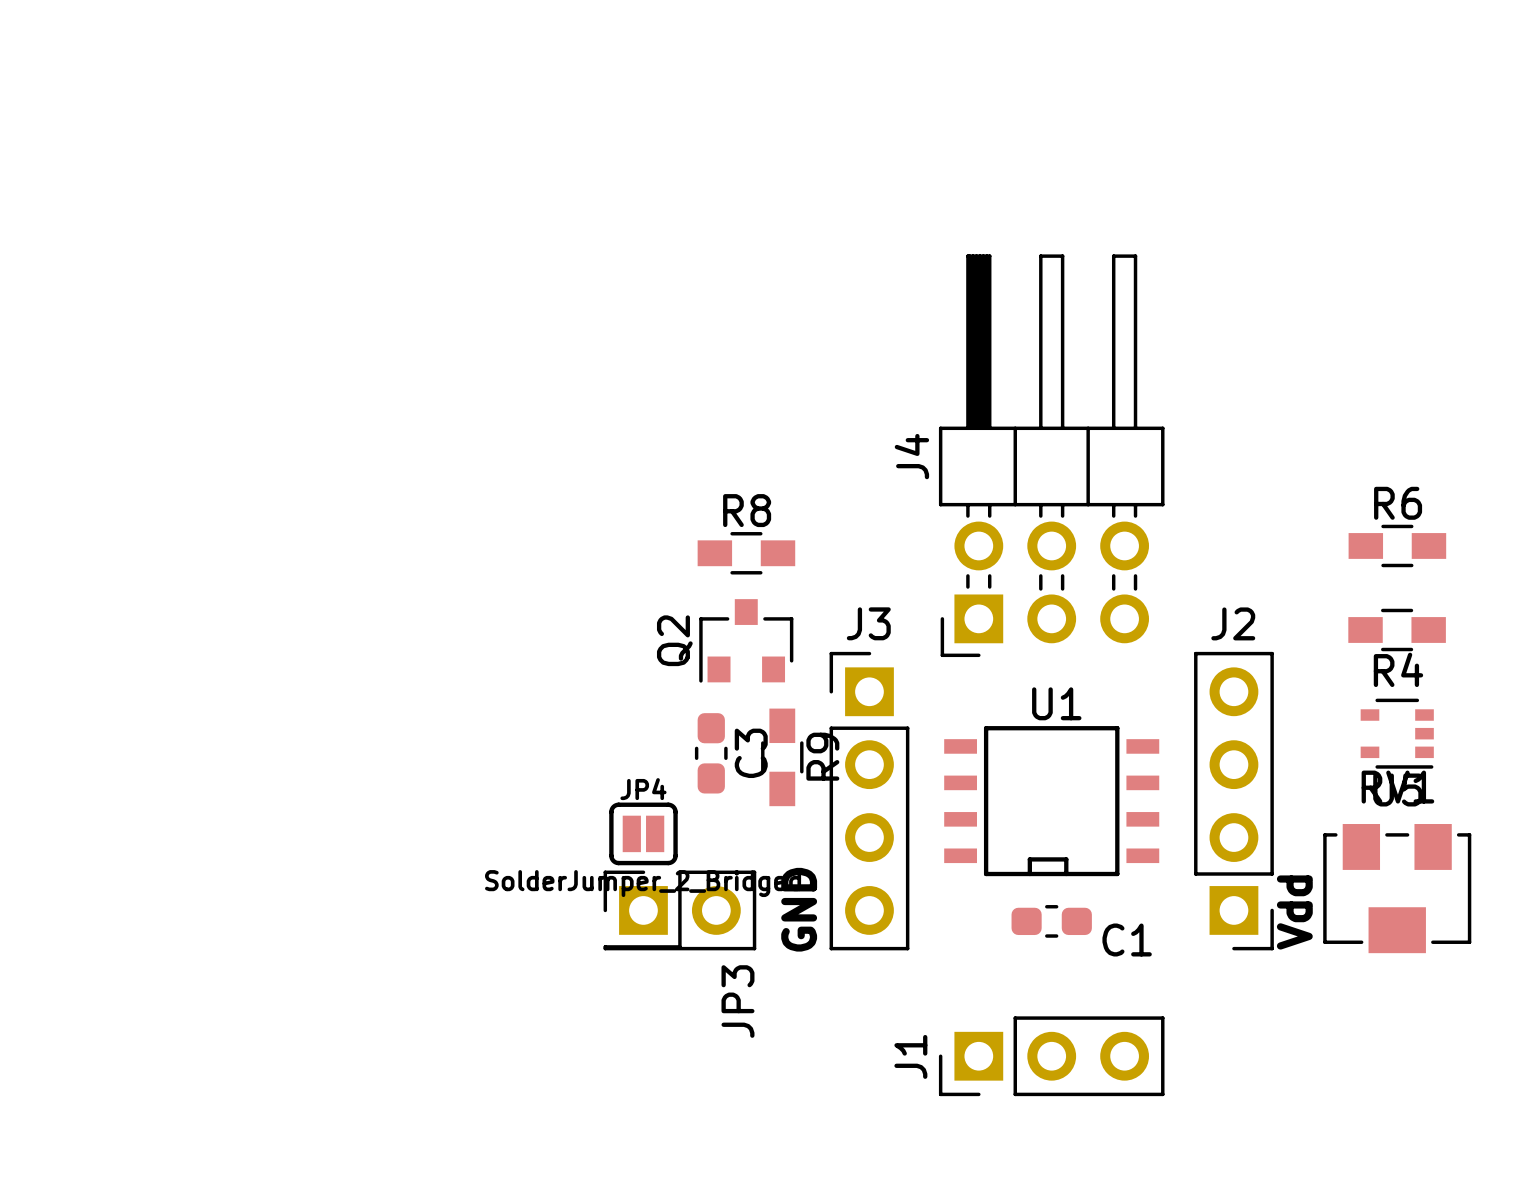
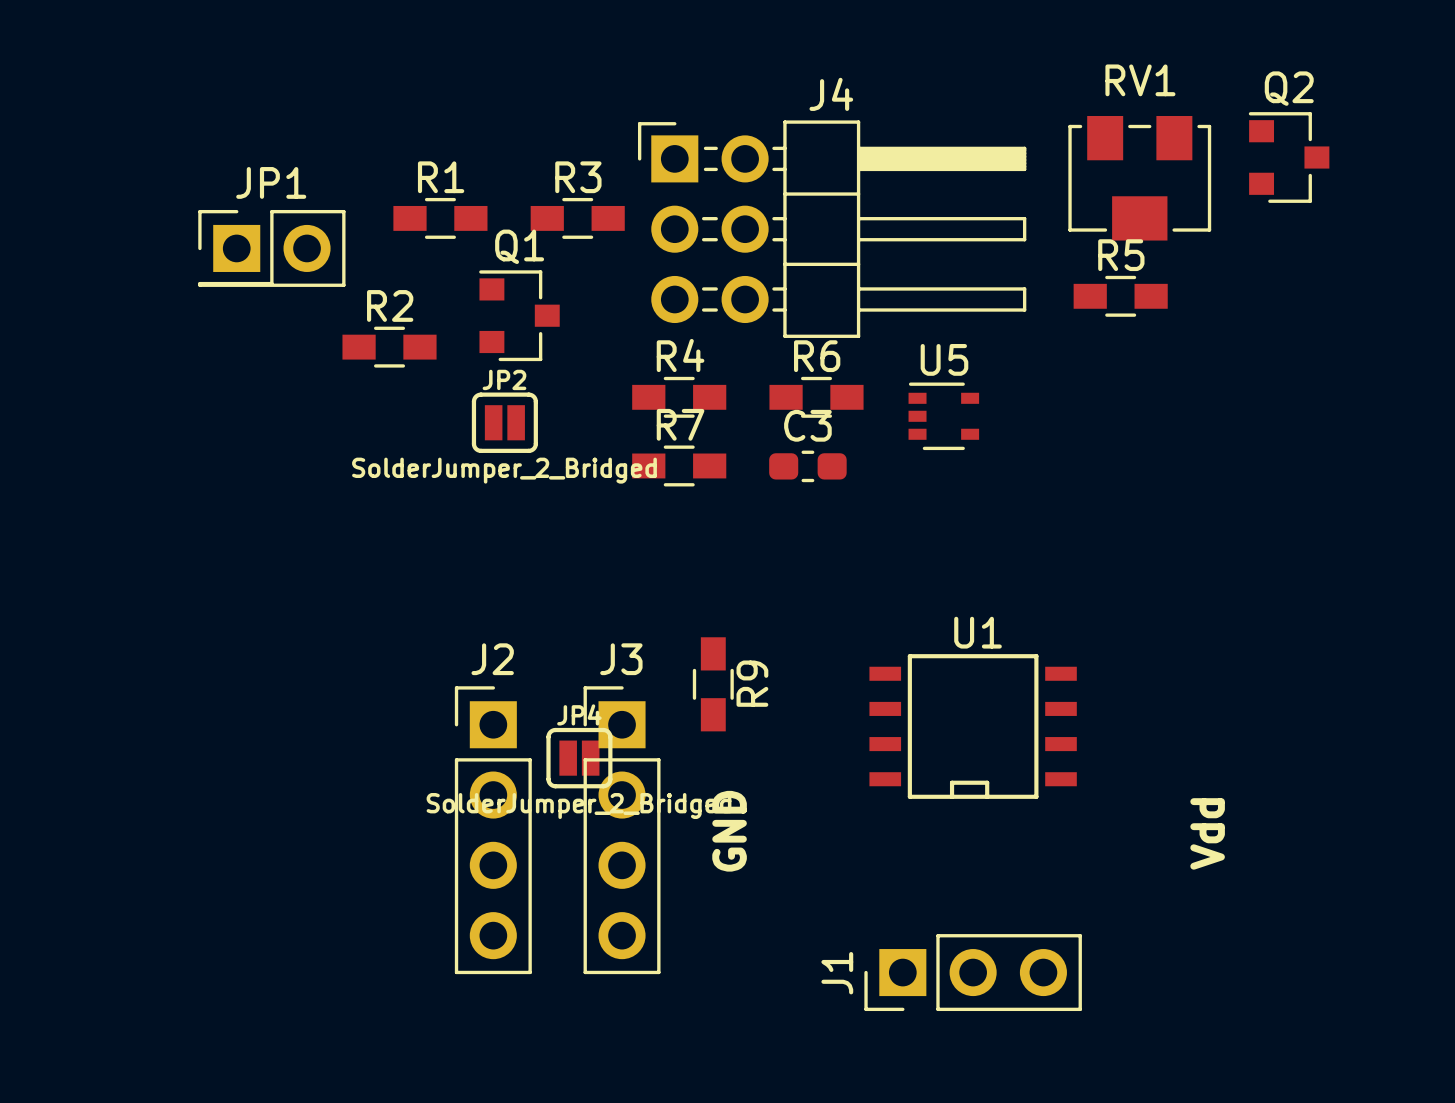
R1: none -> (440, 218)
R3: none -> (577, 218)
JP1: none -> (271, 248)
R5: none -> (1120, 296)
Q1: none -> (519, 315)
R2: none -> (389, 347)
J4 rotation: 0° (1051, 455) -> 90° clockwise (832, 229)
JP2: none -> SolderJumper_2_Bridged (504, 422)
R8 name: R8 (747, 510) -> R7 (680, 424)
R6 position: (1397, 545) -> (816, 397)
R8 position: (746, 553) -> (679, 465)
R4 position: (1397, 630) -> (679, 397)
Q2 rotation: 0° (746, 640) -> 90° clockwise (1289, 157)
Q2 position: (746, 640) -> (1289, 157)
R4 name position: R4 (1398, 669) -> R4 (680, 355)
U5 rotation: 0° (1397, 733) -> 180° (943, 416)
U5 position: (1397, 733) -> (943, 416)
C3 rotation: 0° (711, 753) -> 90° clockwise (807, 466)
C3 position: (711, 753) -> (807, 466)
C3 name position: C3 (751, 753) -> C3 (807, 425)
J3 position: (869, 801) -> (622, 830)
J2 rotation: 0° (1233, 801) -> 180° (493, 830)
J2 position: (1233, 801) -> (493, 830)
RV1 position: (1397, 888) -> (1139, 178)
JP3: (679, 910) -> none
C1: (1051, 921) -> none

